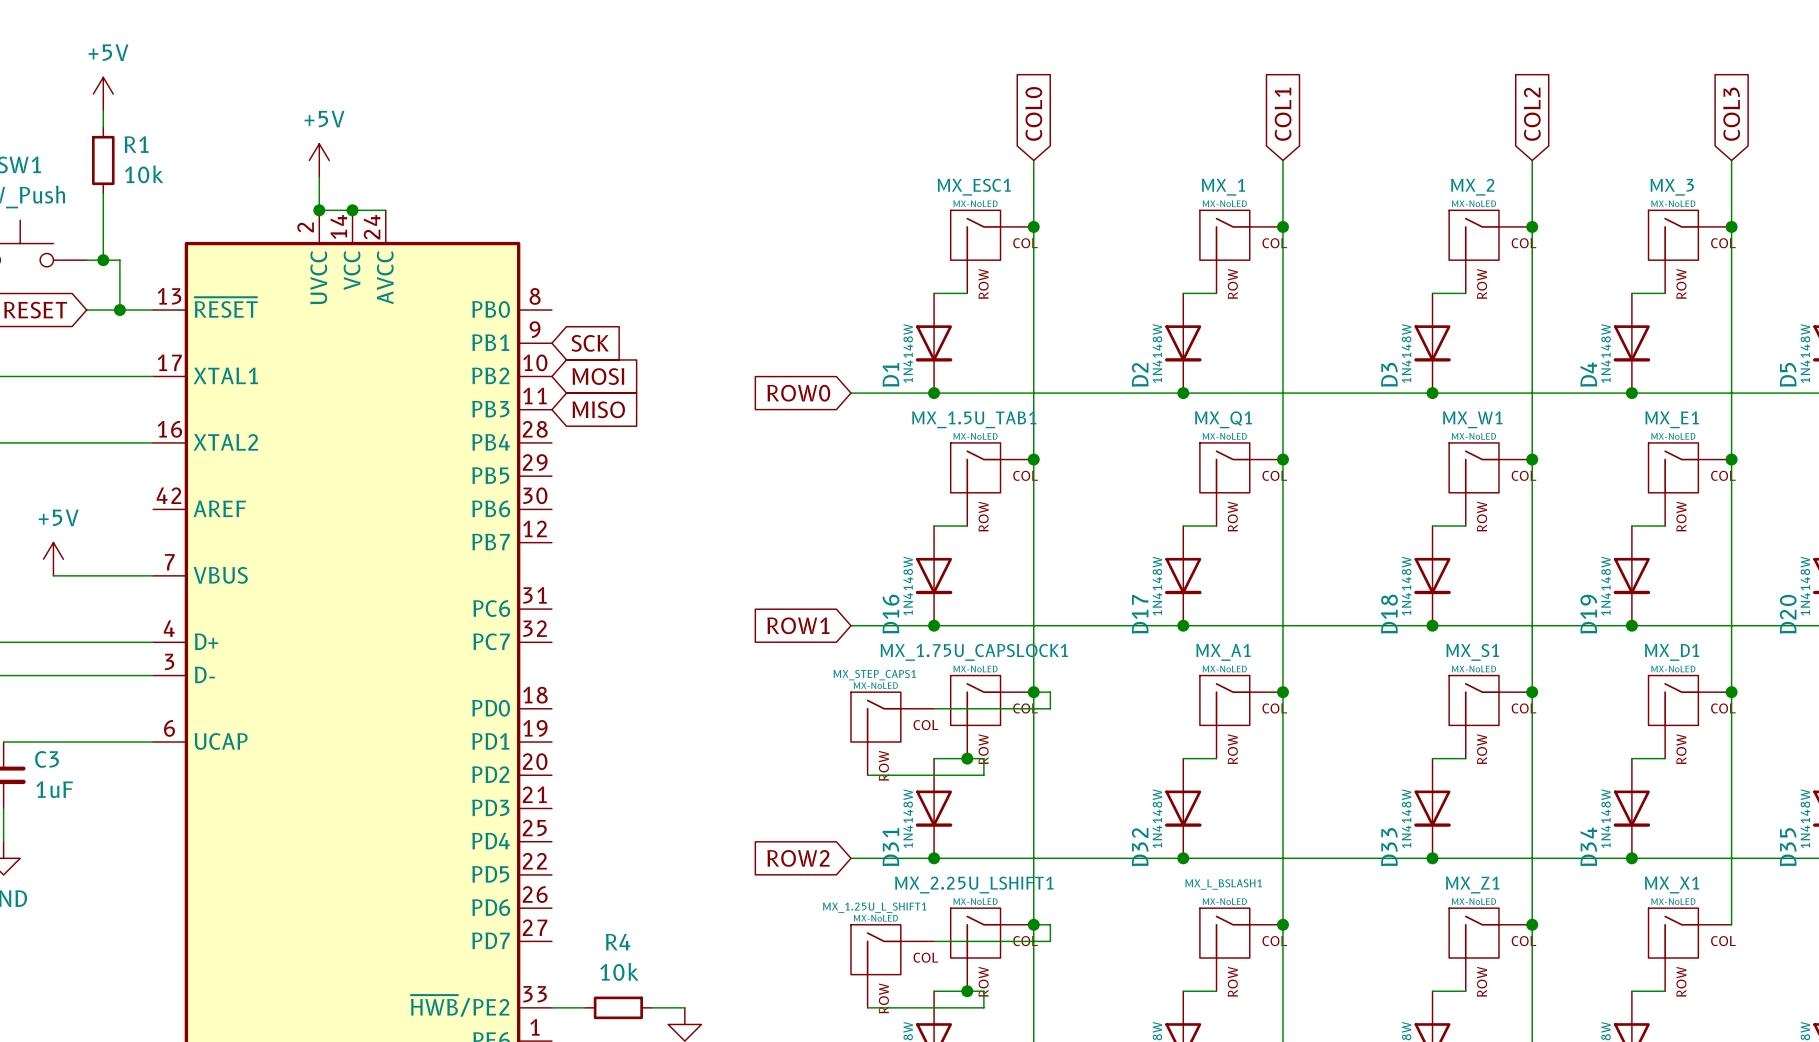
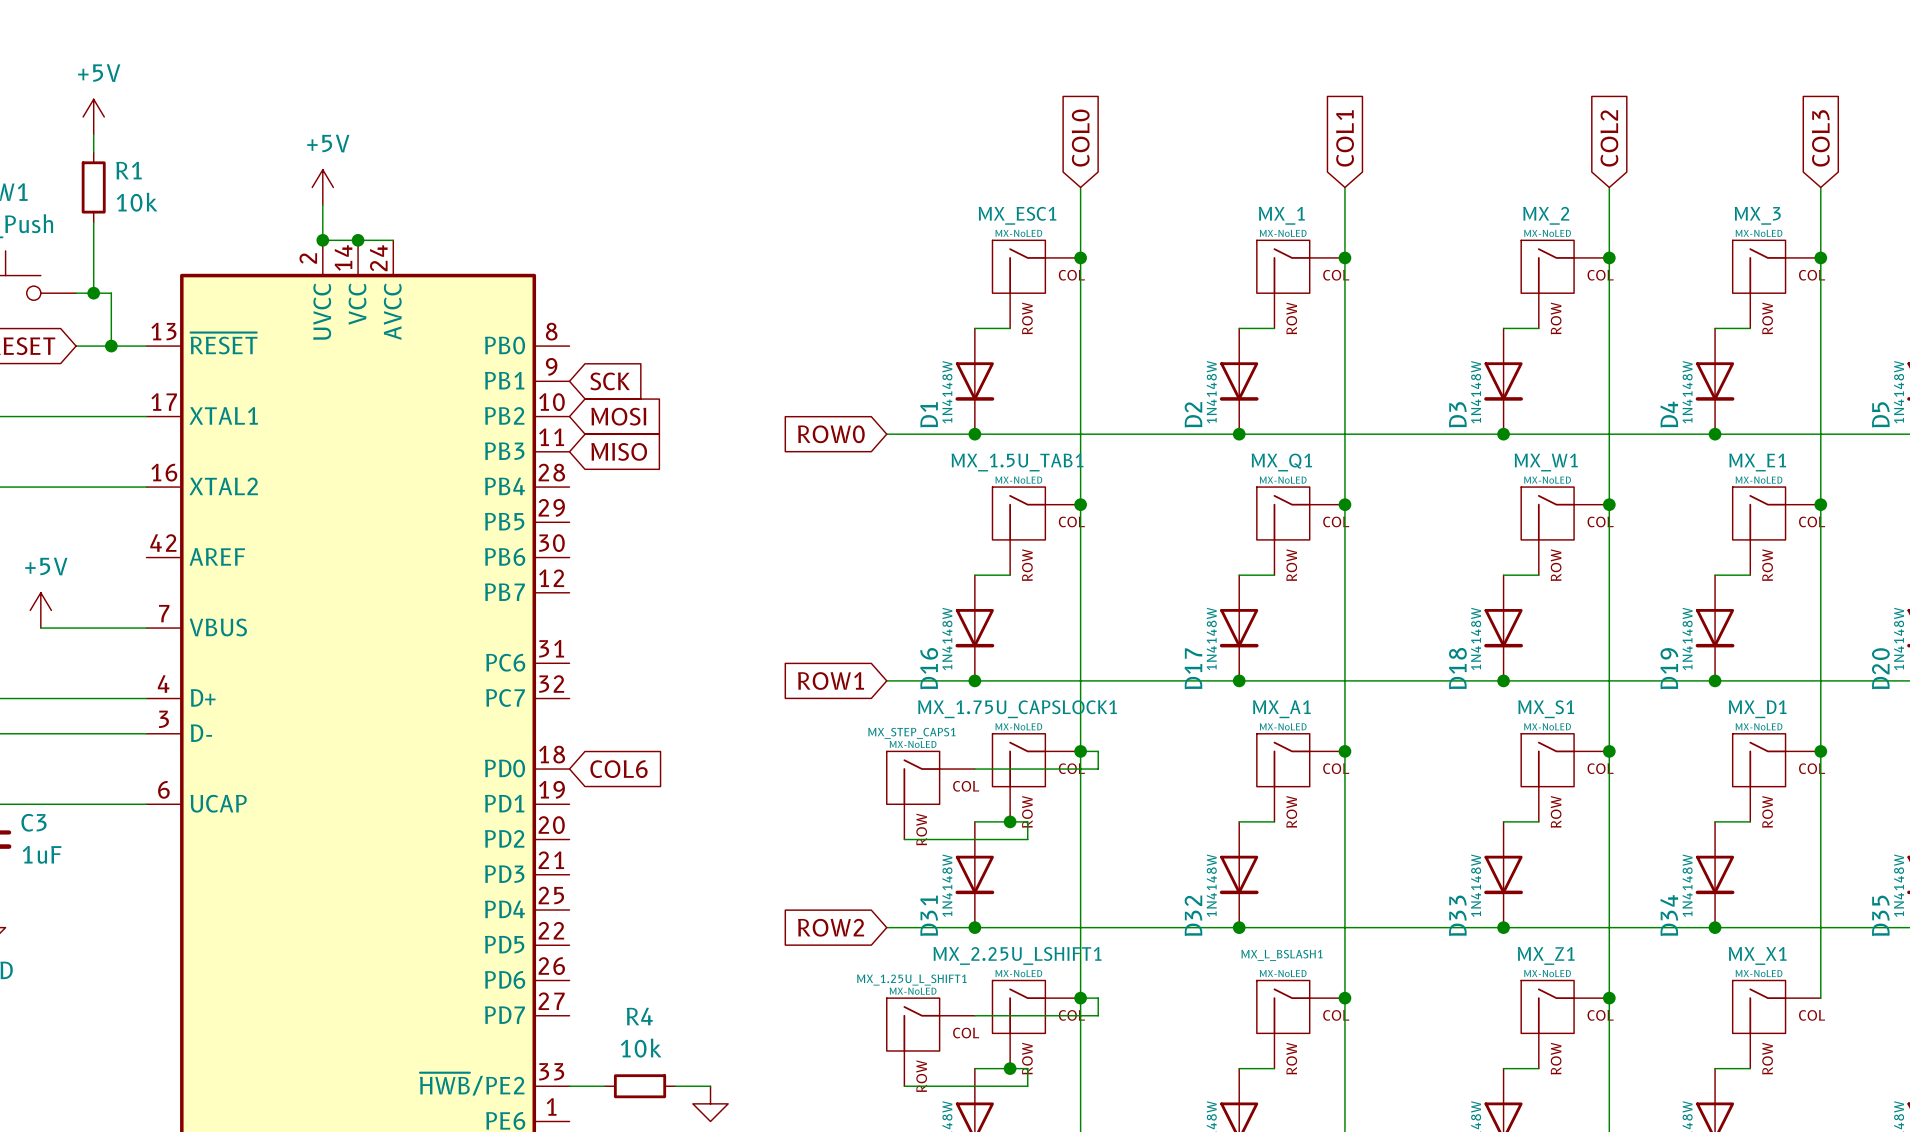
global label: none -> COL6 (619, 769)

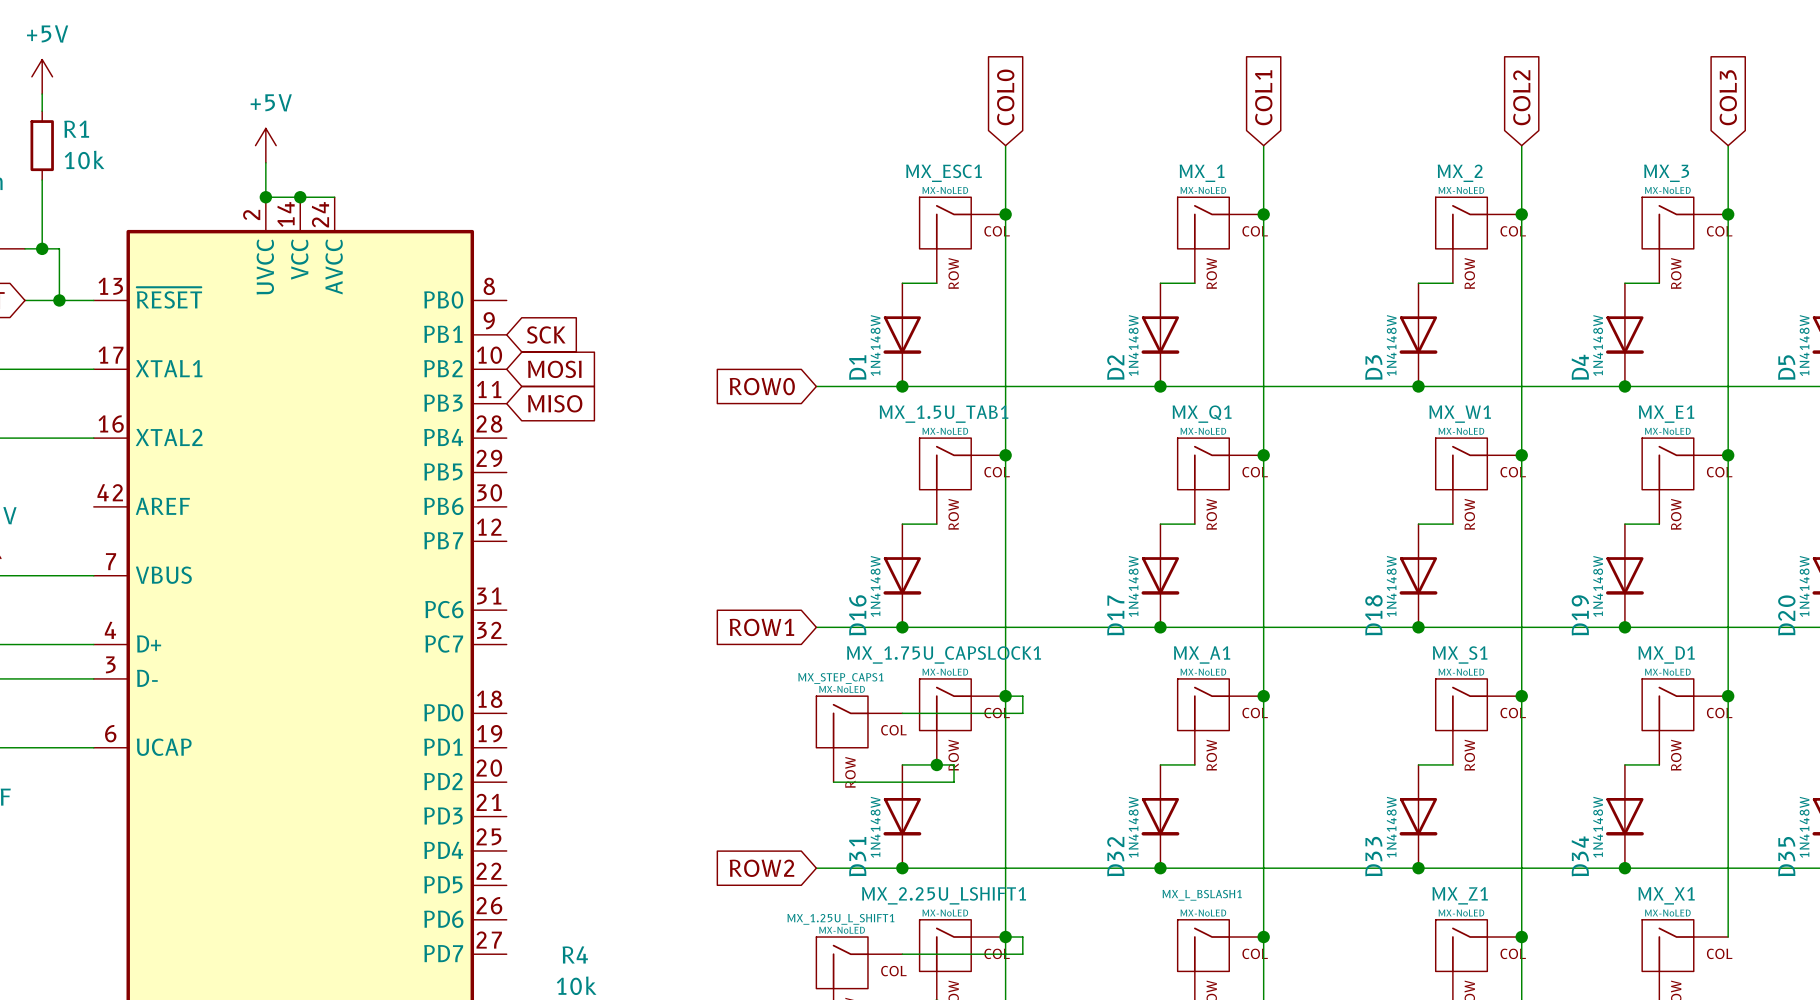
global label: COL6 (619, 769) -> none

